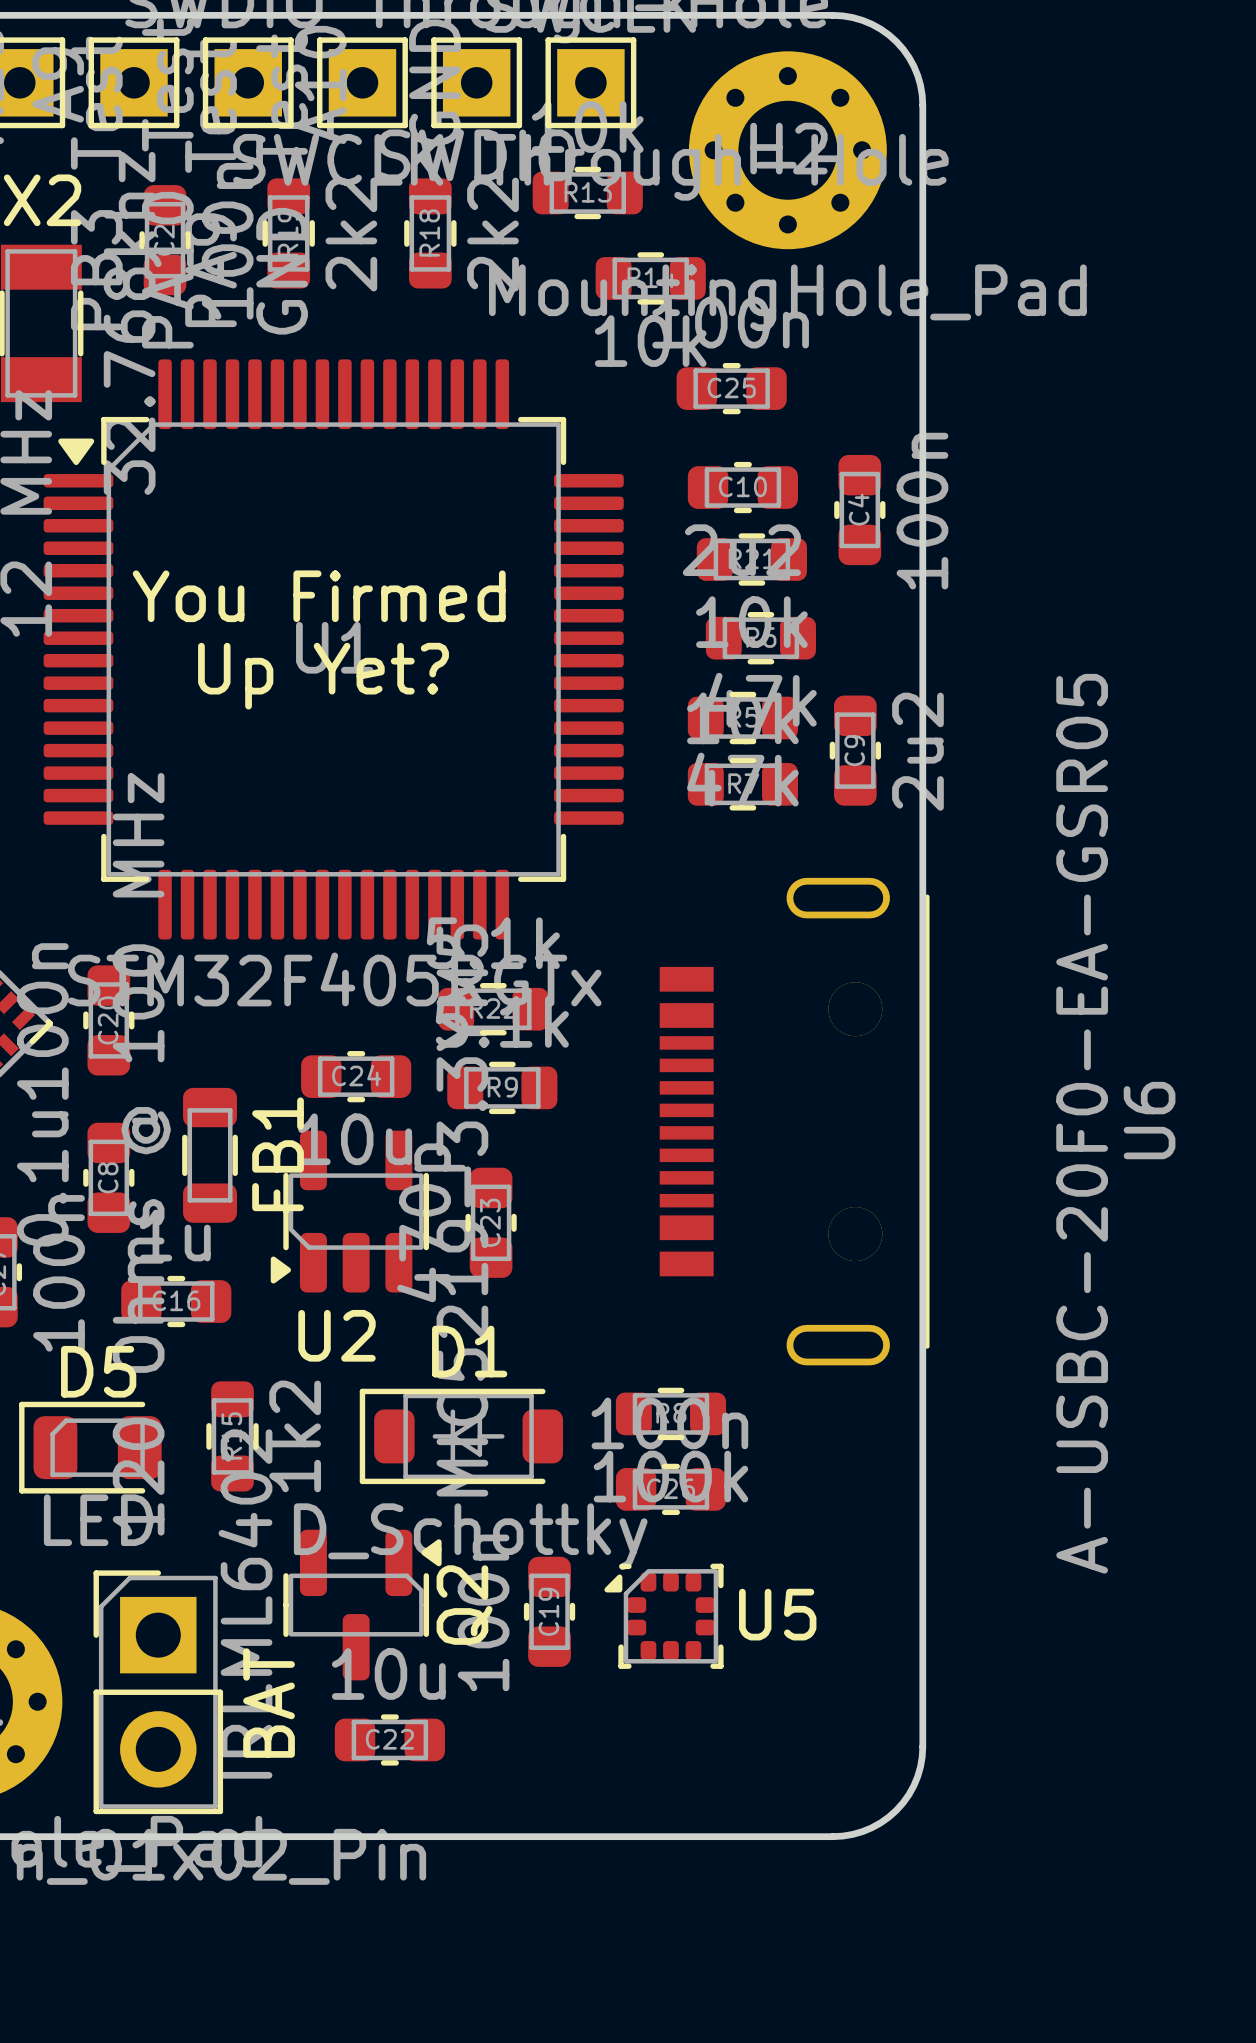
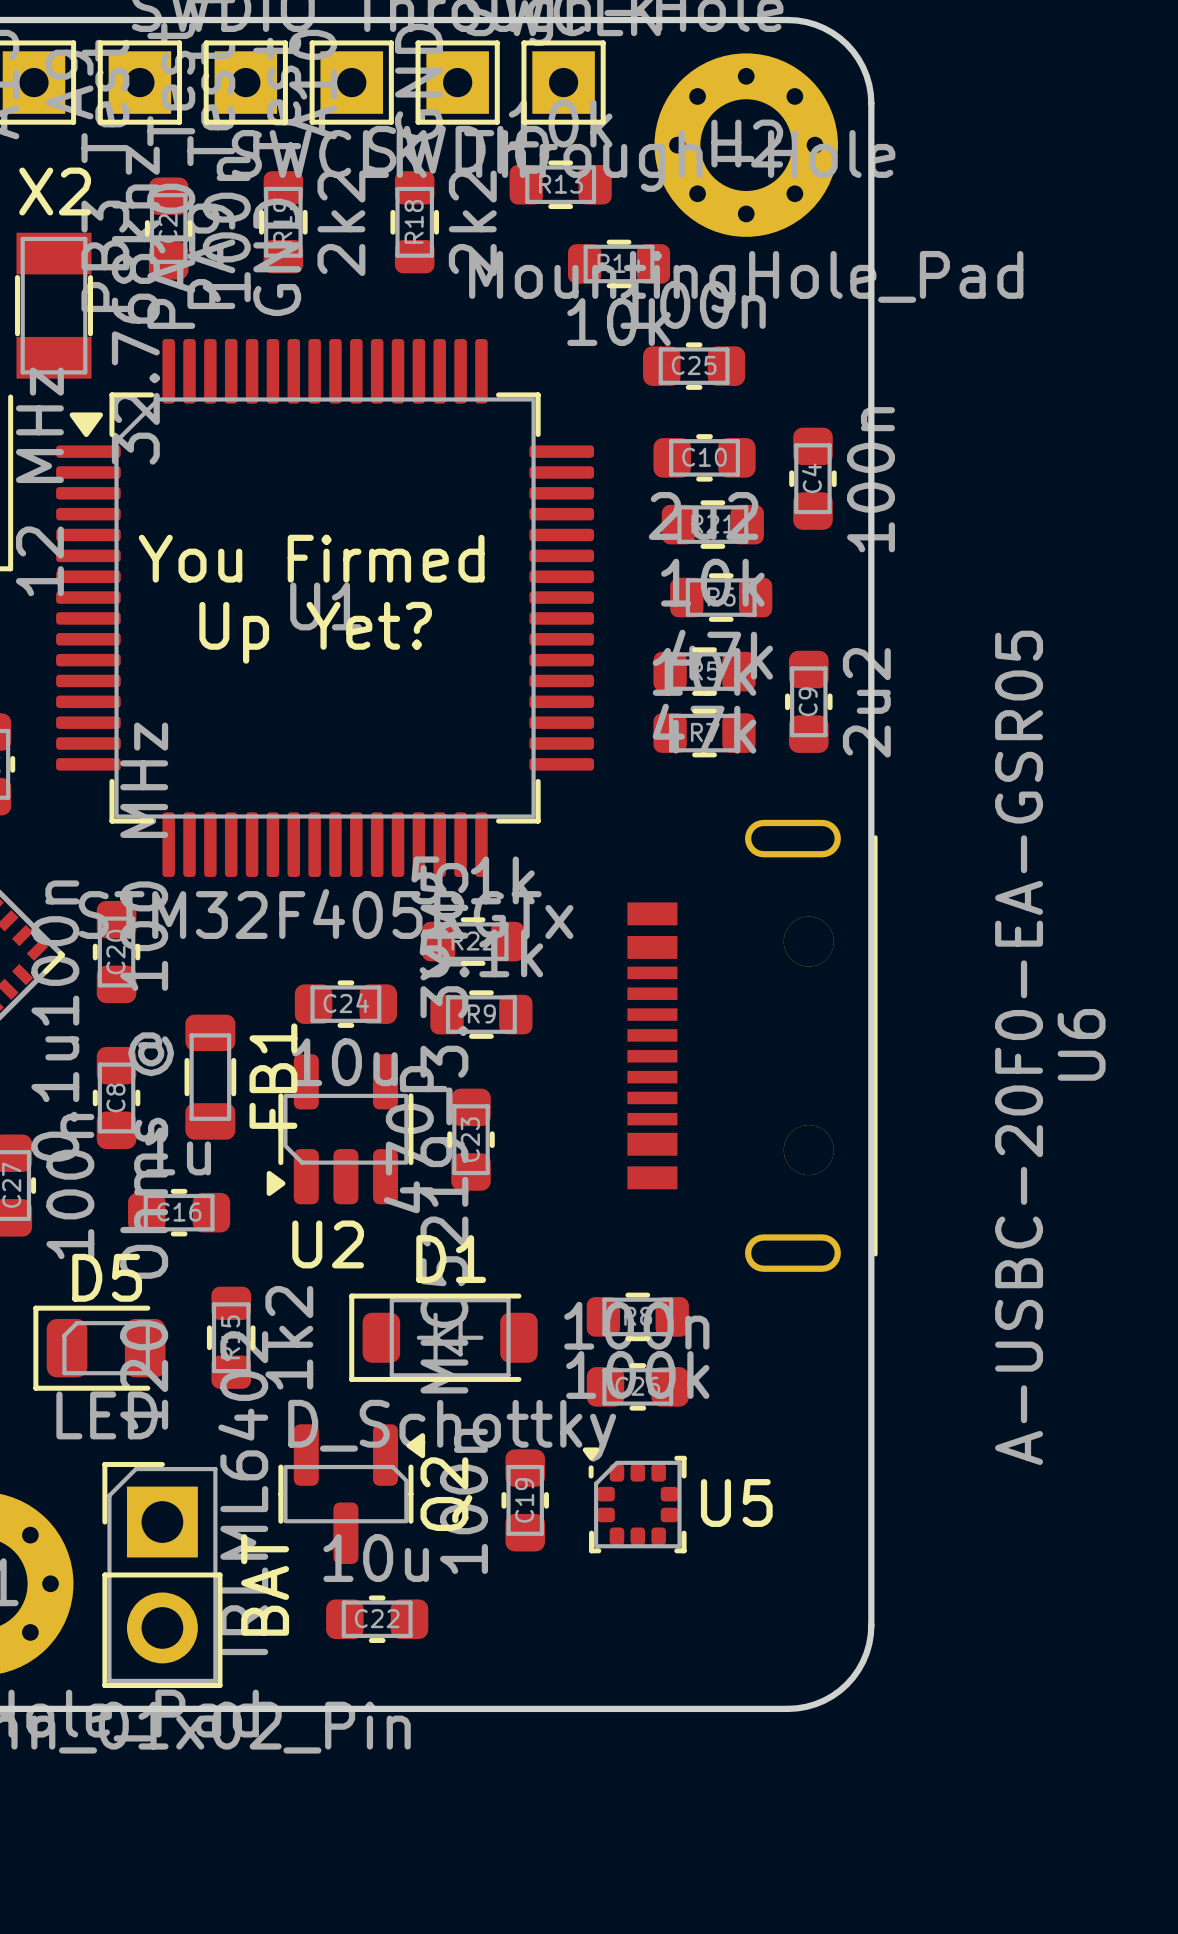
U5 footprint: [604, 1563, 724, 1669] -> [582, 1447, 687, 1554]

